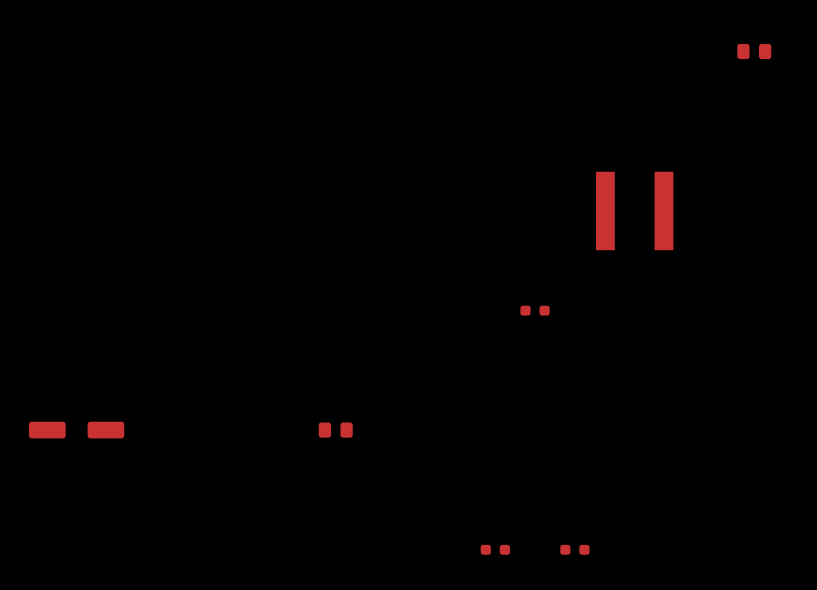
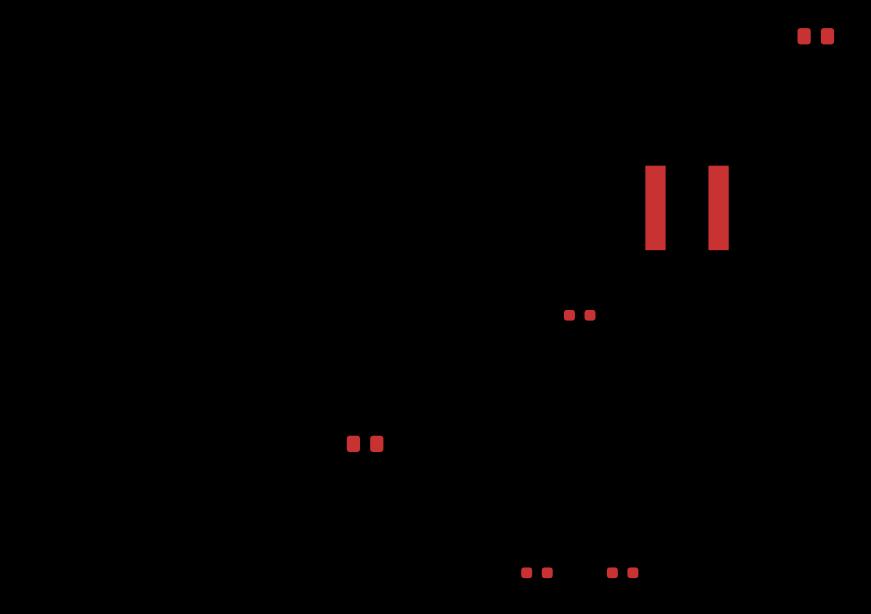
part: (76, 430) -> none

